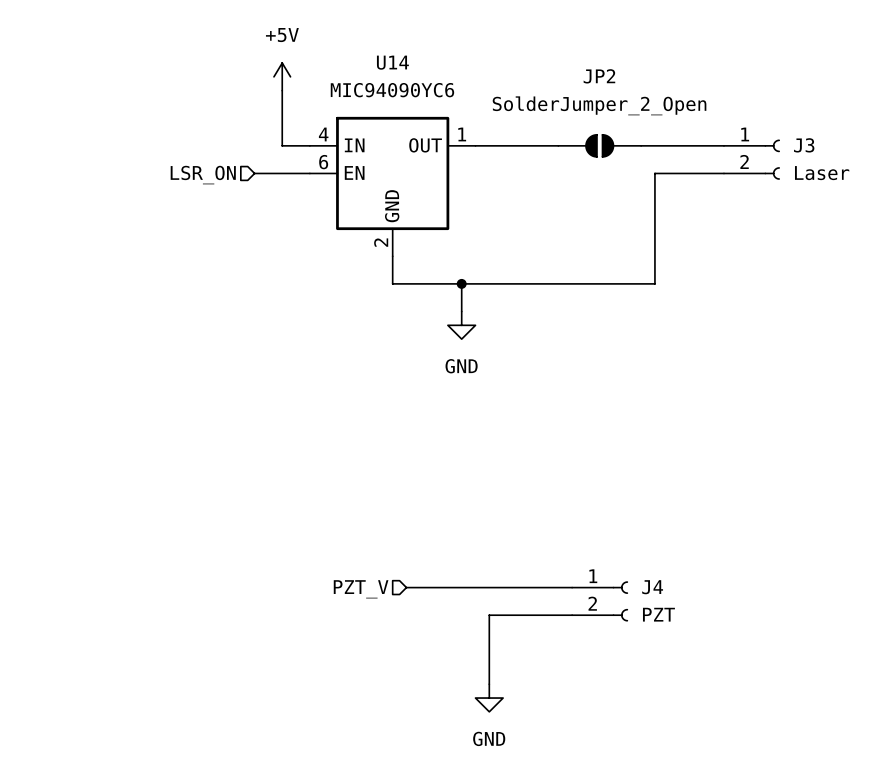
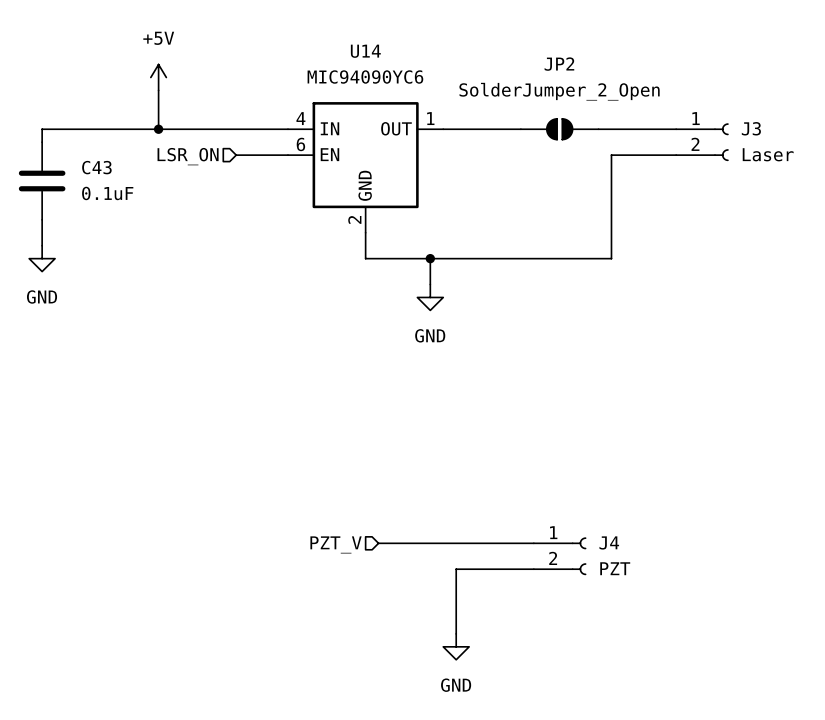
power symbol position: +5V (282, 76) -> +5V (158, 77)
wire: (282, 90) (282, 145) -> (42, 142) (42, 129) (262, 129)
wire: none -> (158, 90) (158, 129)
junction: none -> (158, 129)
C43: none -> 0.1uF (42, 181)
wire: none -> (42, 219) (42, 245)
power symbol: none -> GND (42, 258)

